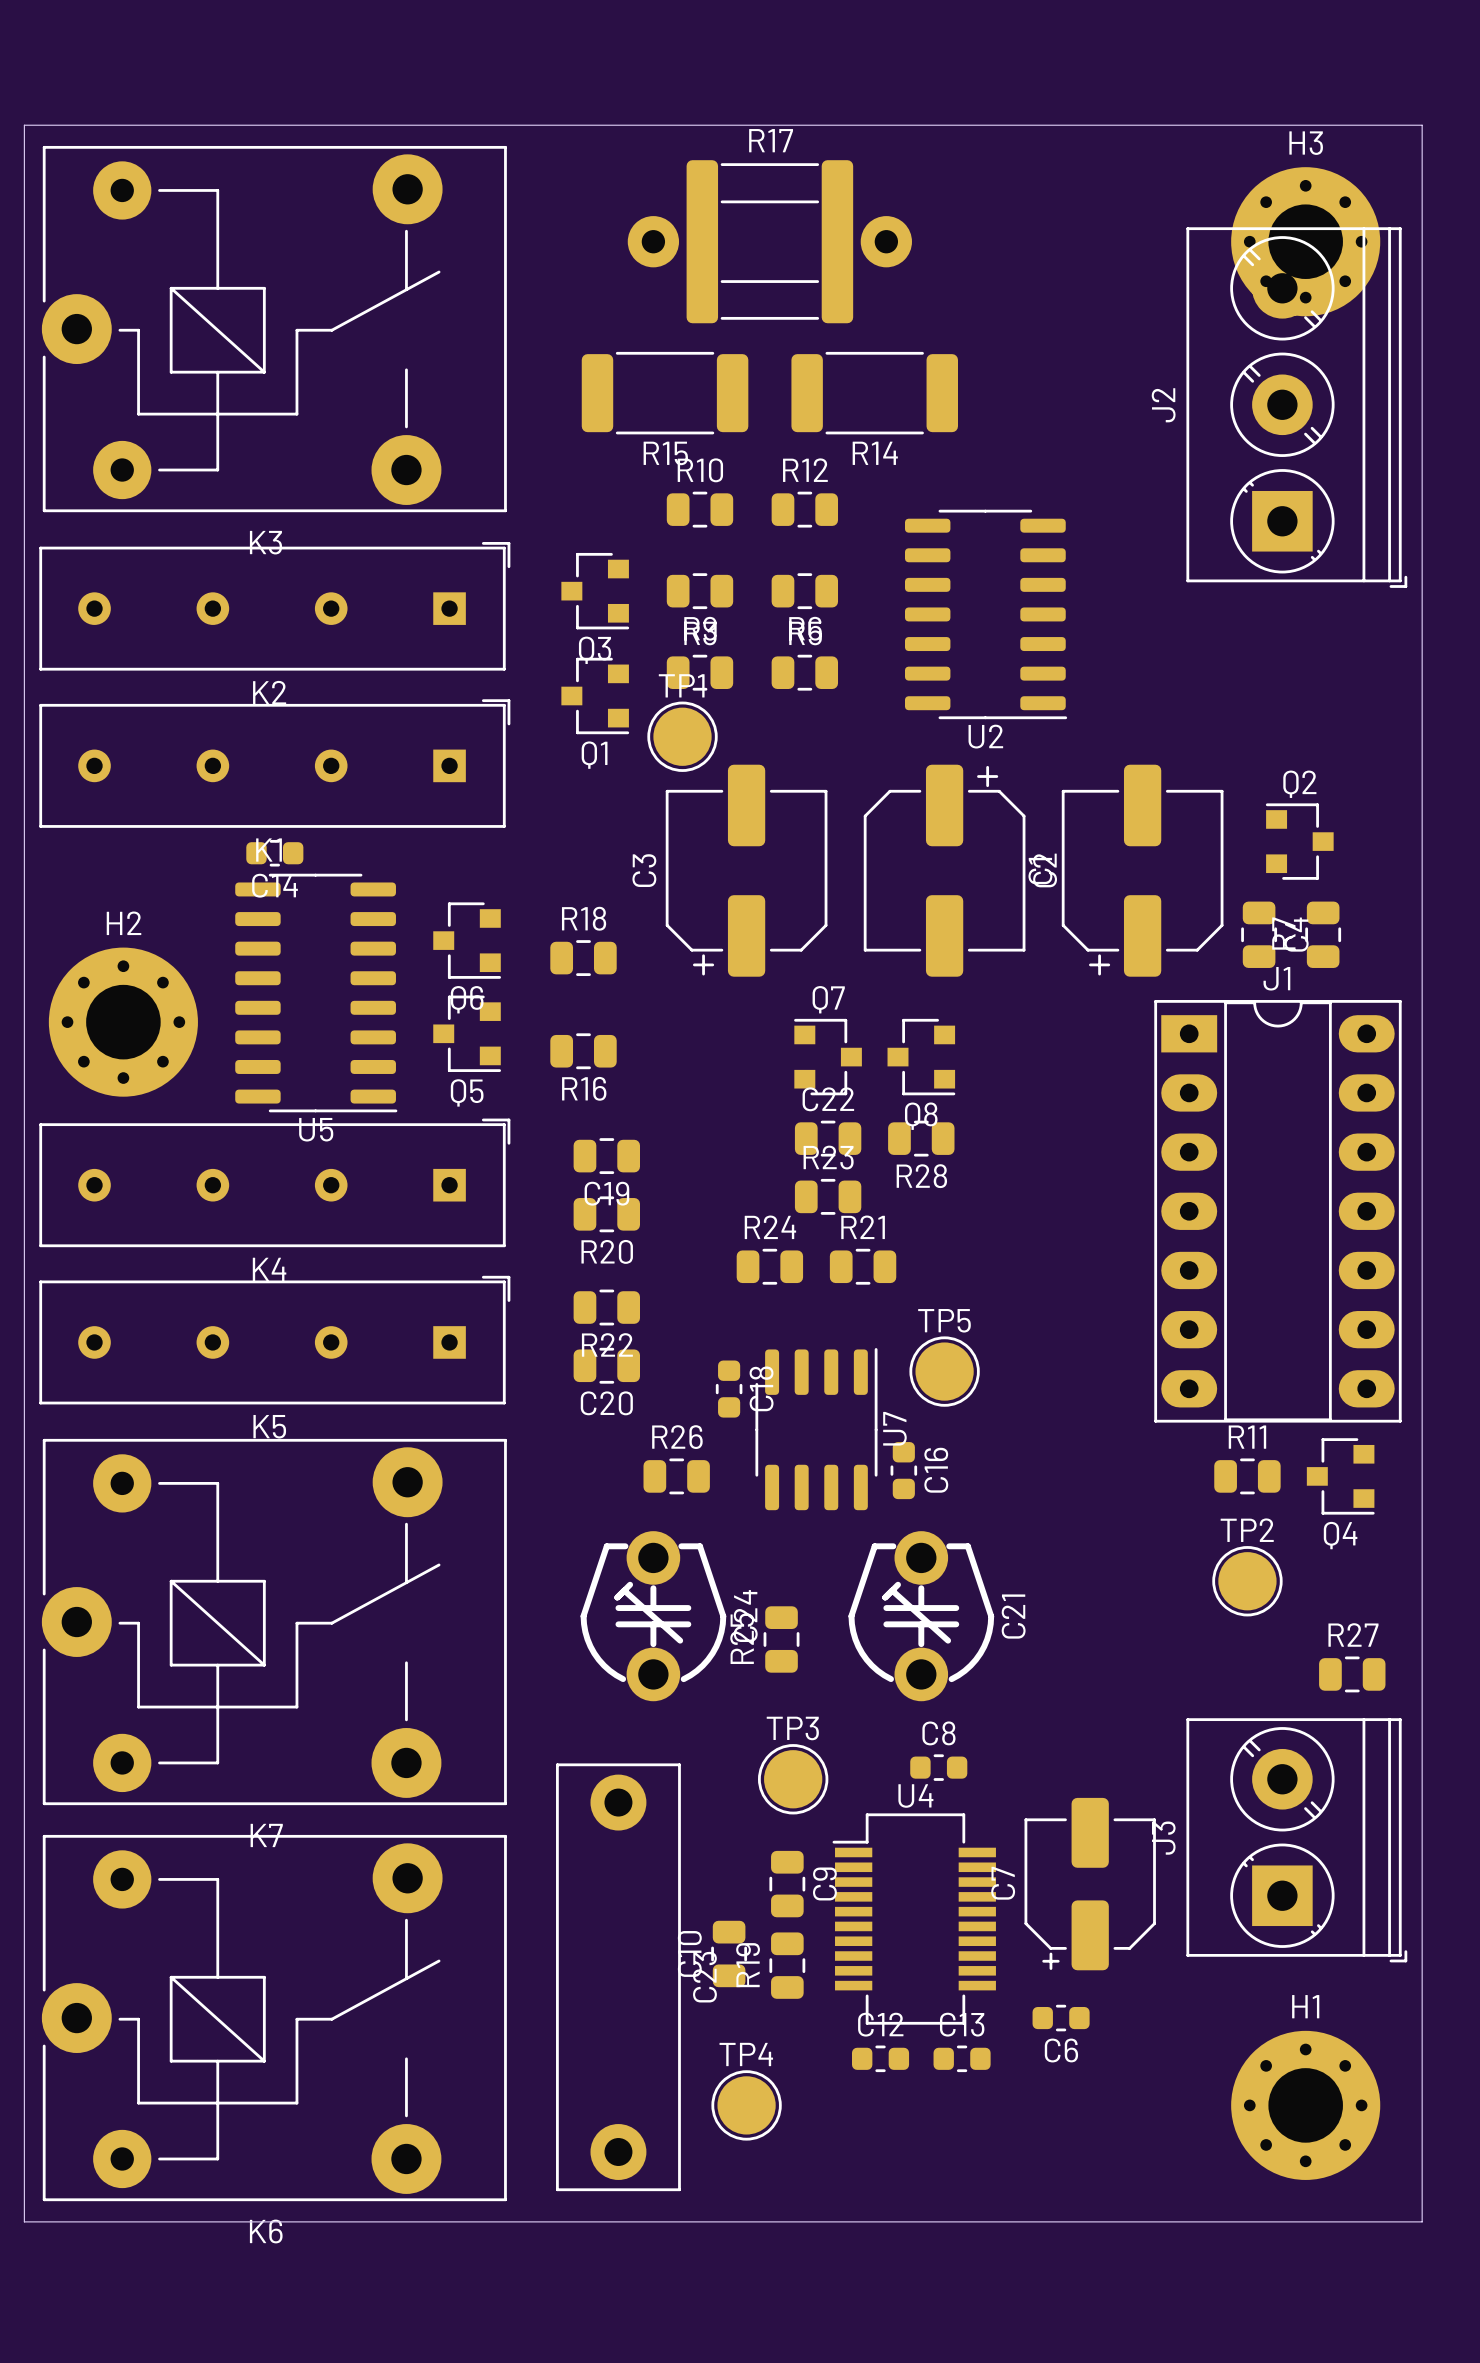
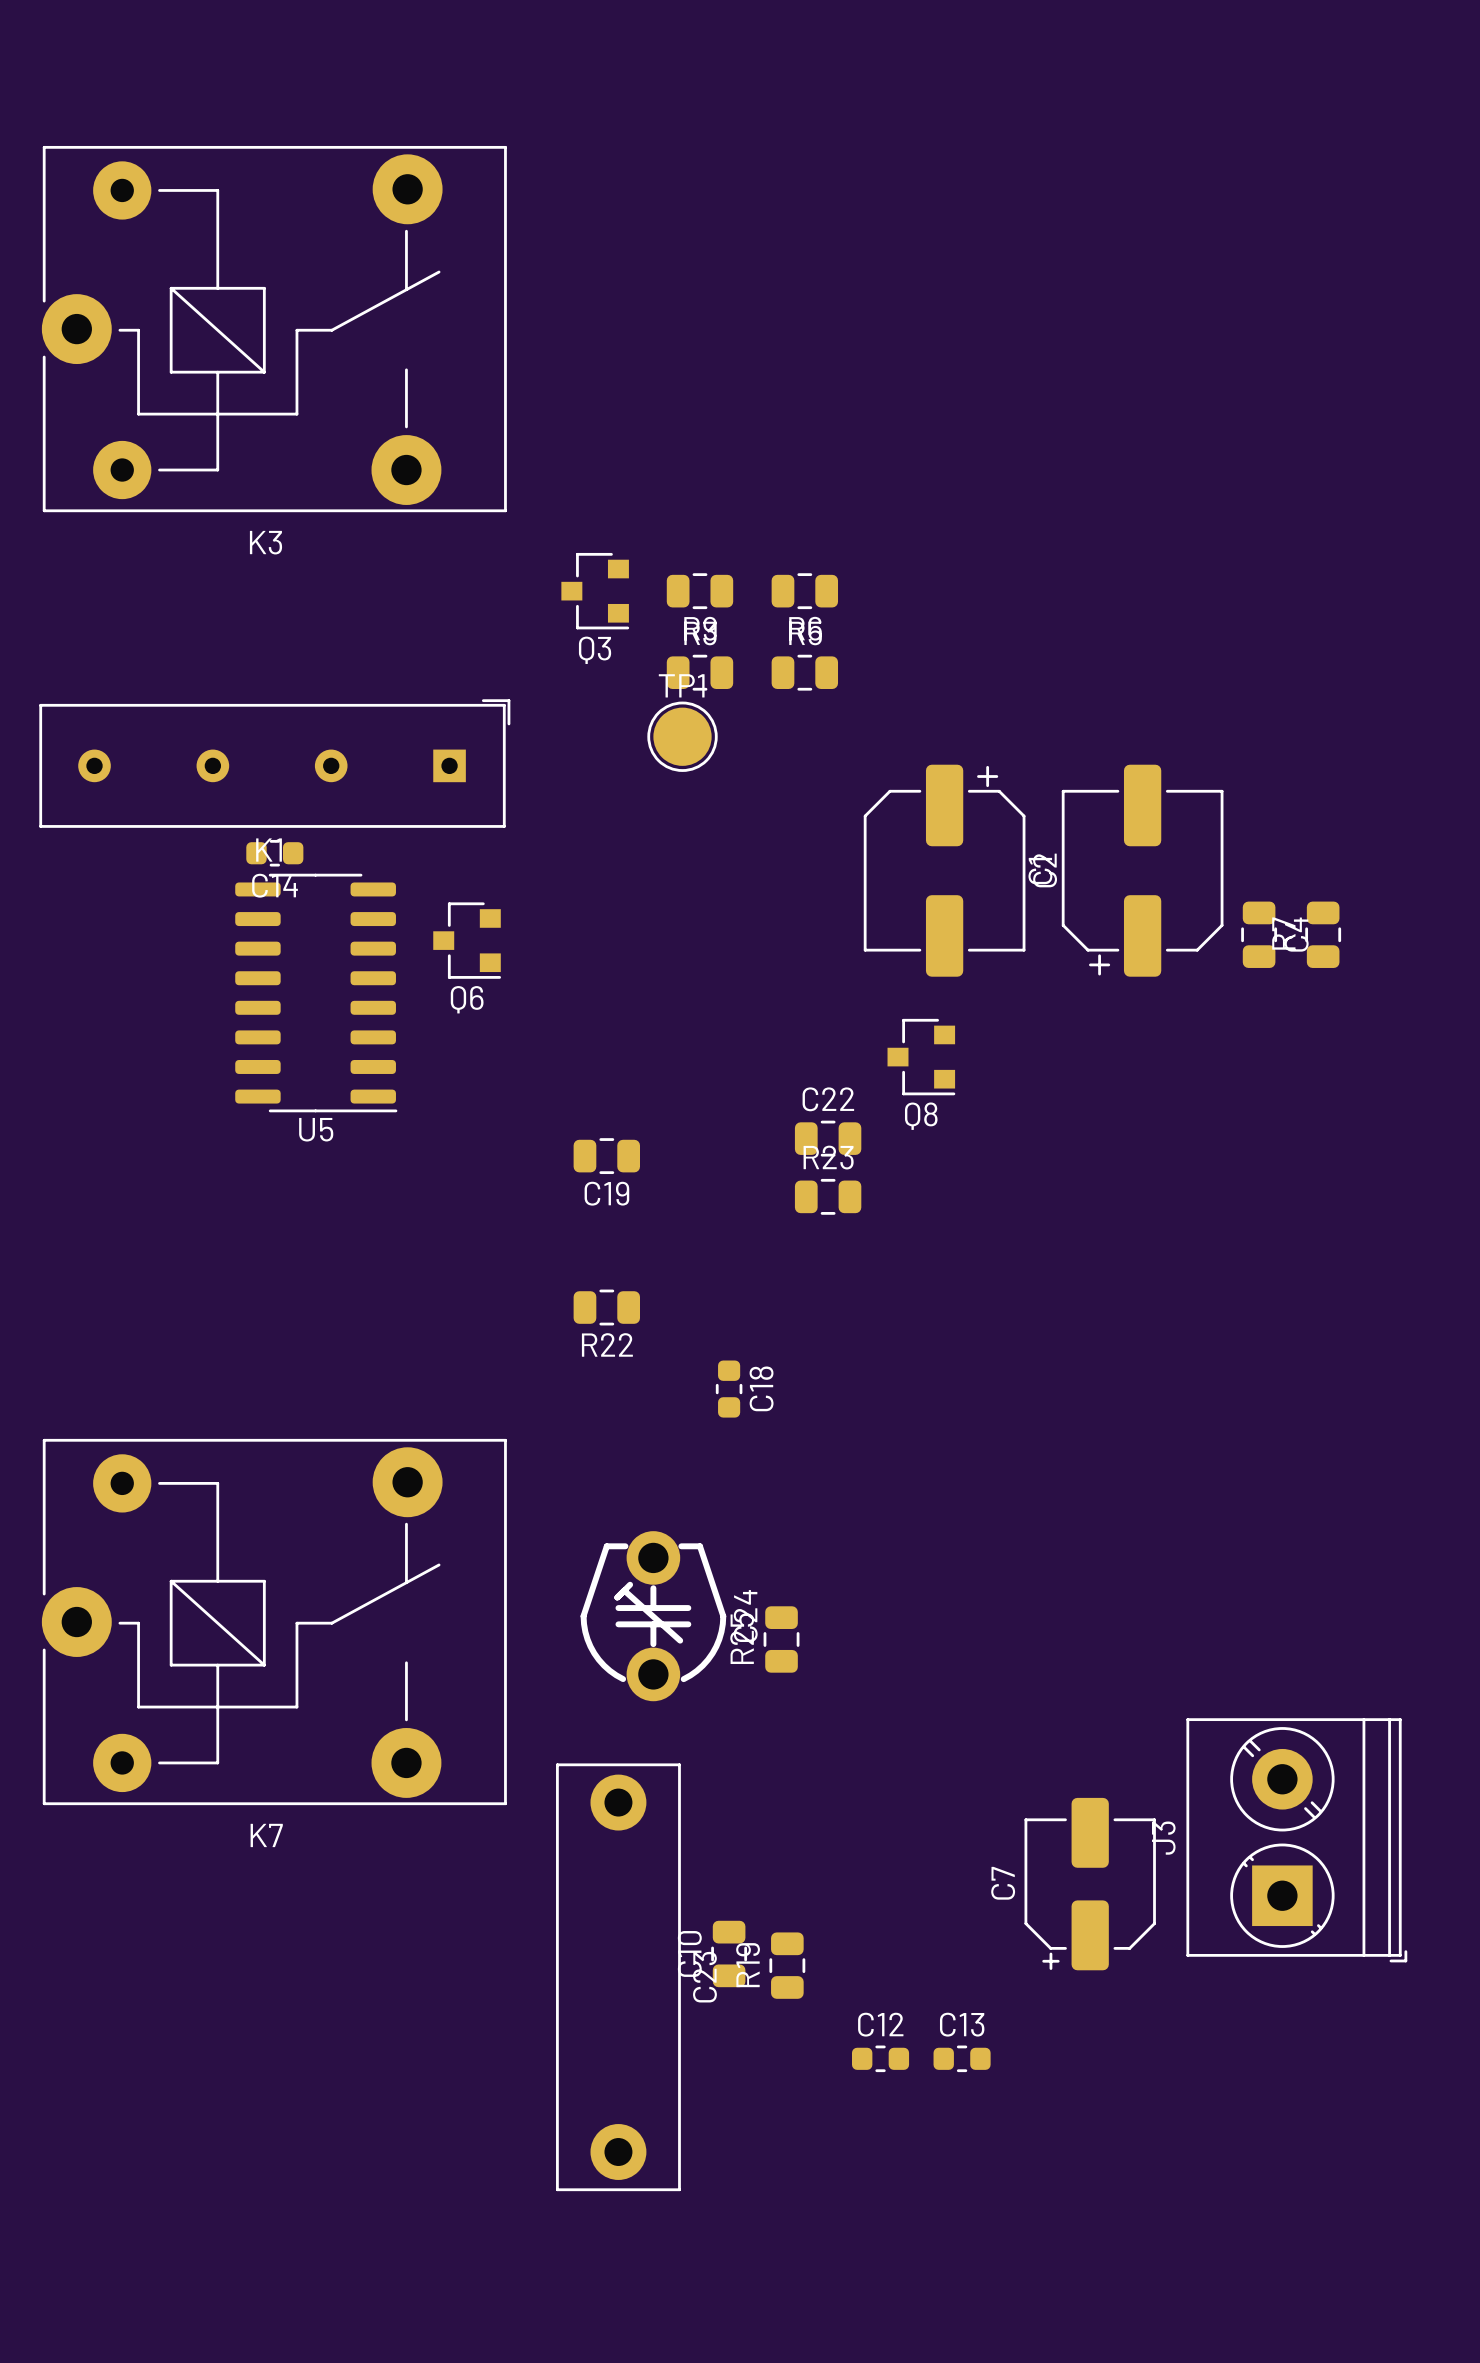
board edge: (24, 125) (24, 2221) (1422, 2221) (1422, 125) (24, 125) -> none
R17: (769, 241) -> none
H3: (1305, 241) -> none
R15: (665, 393) -> none
R14: (874, 393) -> none
J2: (1296, 407) -> none
R10: (699, 509) -> none
R12: (804, 509) -> none
K2: (274, 606) -> none
U2: (986, 614) -> none
Q1: (595, 695) -> none
Q2: (1299, 841) -> none
C3: (746, 870) -> none
R18: (583, 958) -> none
H2: (123, 1022) -> none
Q5: (467, 1033) -> none
R16: (583, 1051) -> none
Q7: (828, 1057) -> none
R28: (921, 1138) -> none
K4: (274, 1182) -> none
J1: (1277, 1211) -> none
R20: (606, 1214) -> none
R24: (769, 1266) -> none
R21: (863, 1266) -> none
K5: (274, 1340) -> none
C20: (606, 1365) -> none
TP5: (944, 1371) -> none
U7: (816, 1429) -> none
C16: (903, 1470) -> none
R26: (676, 1476) -> none
R11: (1247, 1476) -> none
Q4: (1340, 1476) -> none
TP2: (1247, 1581) -> none
C21: (921, 1616) -> none
R27: (1352, 1674) -> none
C8: (938, 1767) -> none
TP3: (793, 1779) -> none
C9: (787, 1884) -> none
U4: (914, 1919) -> none
K6: (274, 2018) -> none
C6: (1061, 2018) -> none
TP4: (746, 2105) -> none
H1: (1305, 2105) -> none

